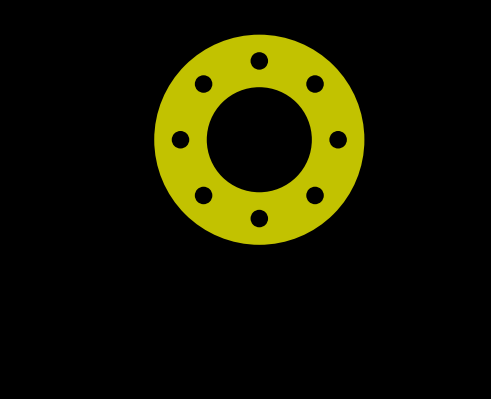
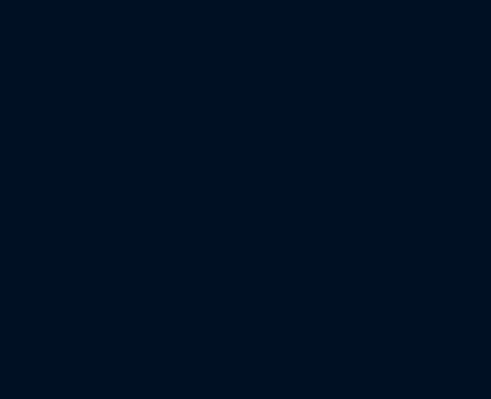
part: (259, 139) -> none

